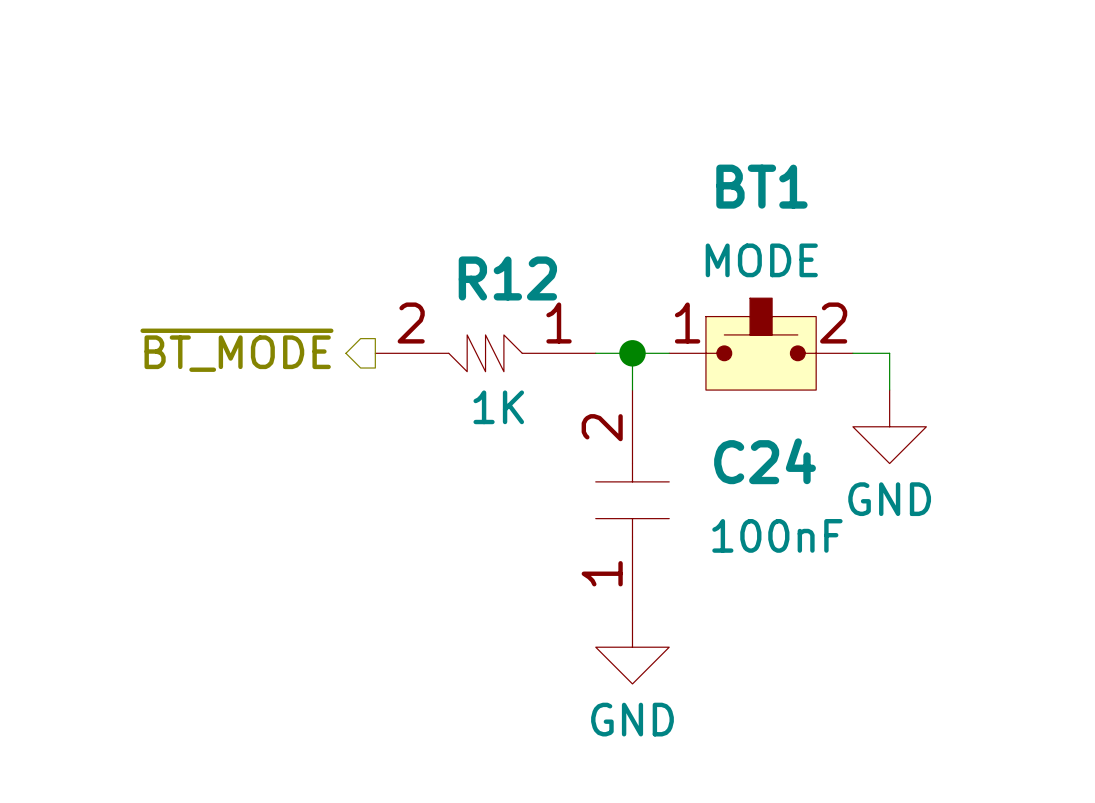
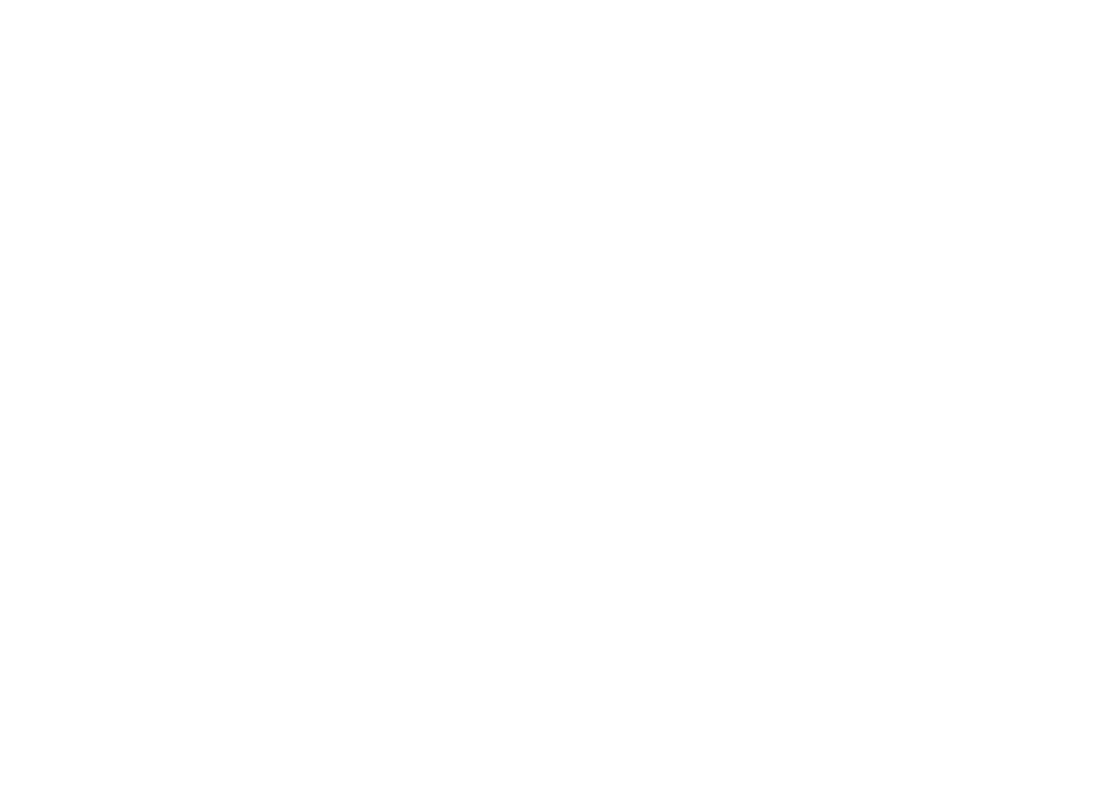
BT1: MODE (761, 344) -> none
hierarchical label: ~{BT_MODE} (236, 350) -> none
R12: 1K (485, 353) -> none
wire: (595, 353) (669, 353) -> none
wire: (632, 353) (632, 390) -> none
junction: (632, 353) -> none
wire: (852, 353) (889, 353) (889, 390) -> none
power symbol: GND (889, 426) -> none
C24: 100nF (632, 500) -> none
power symbol: GND (632, 647) -> none

